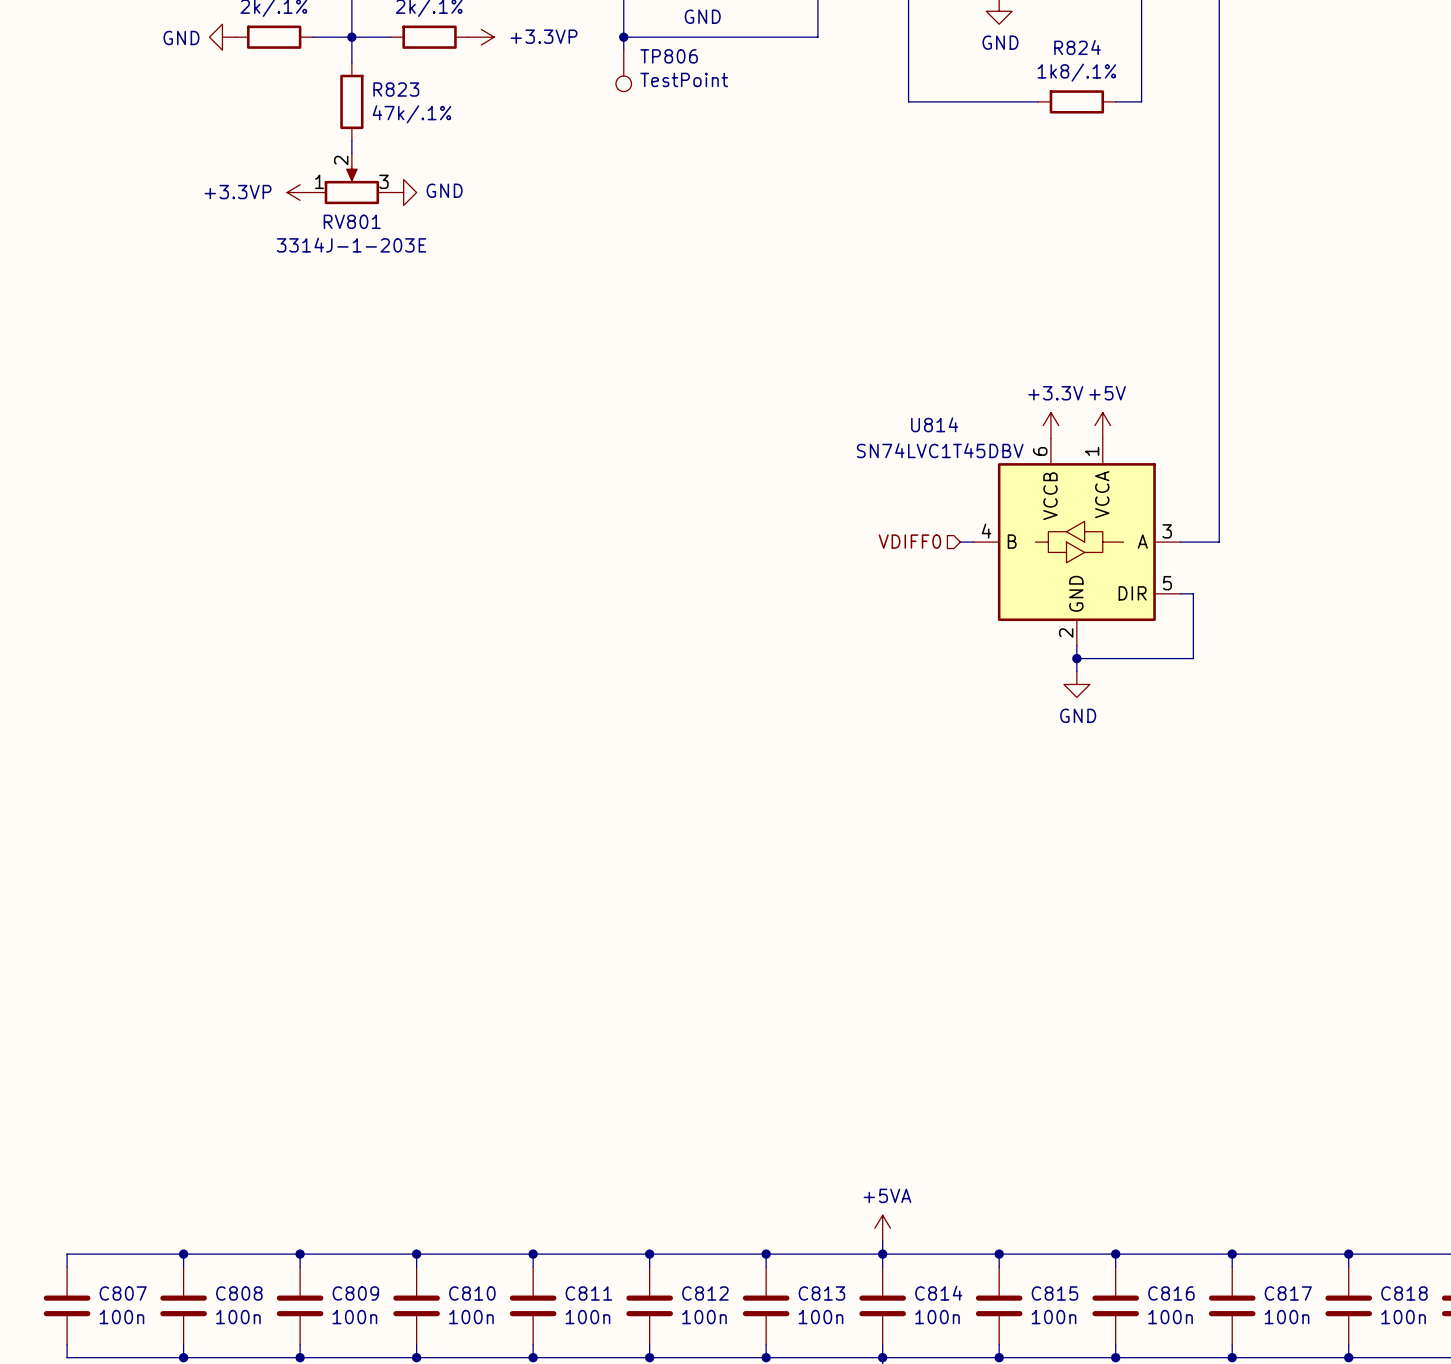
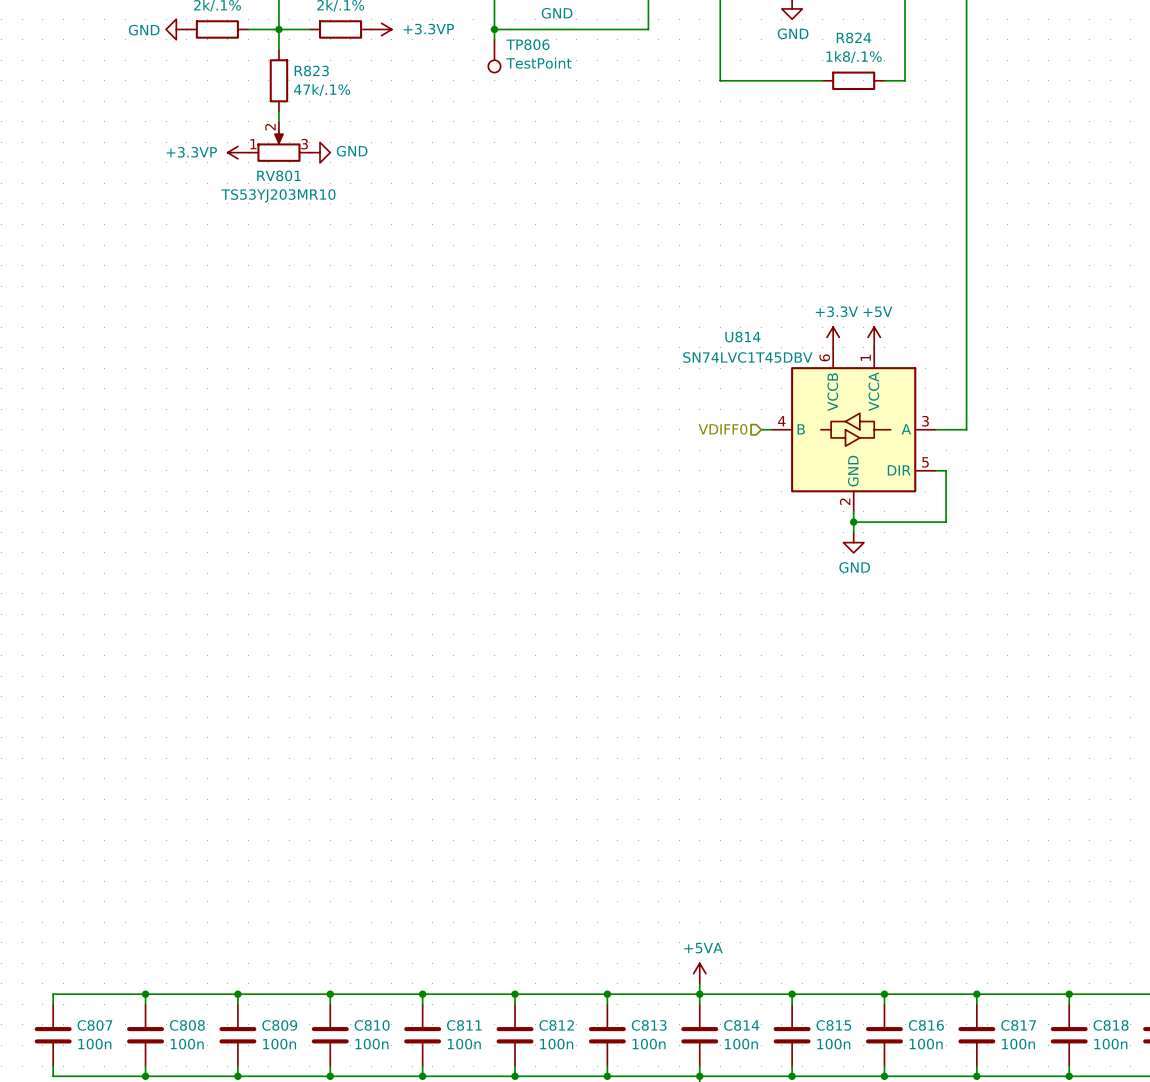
RV801 value: 3314J-1-203E (351, 245) -> TS53YJ203MR10 (278, 195)

